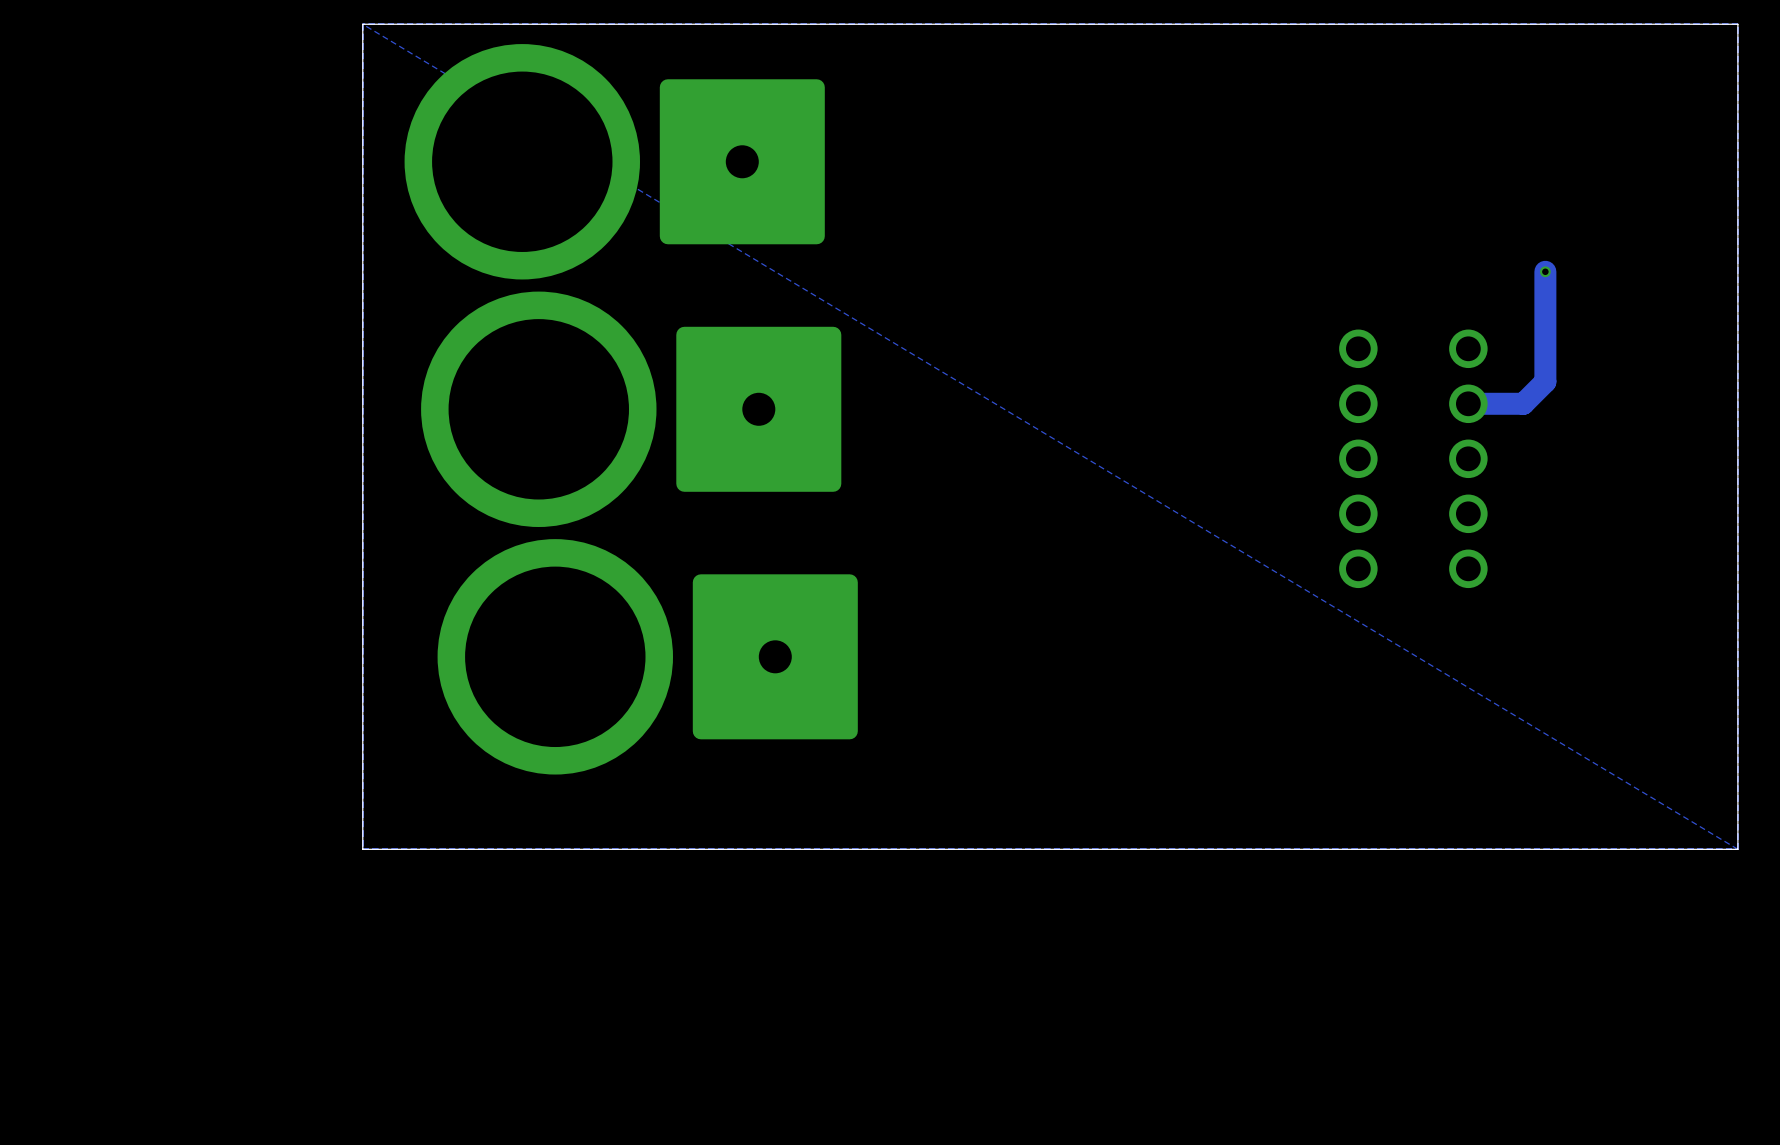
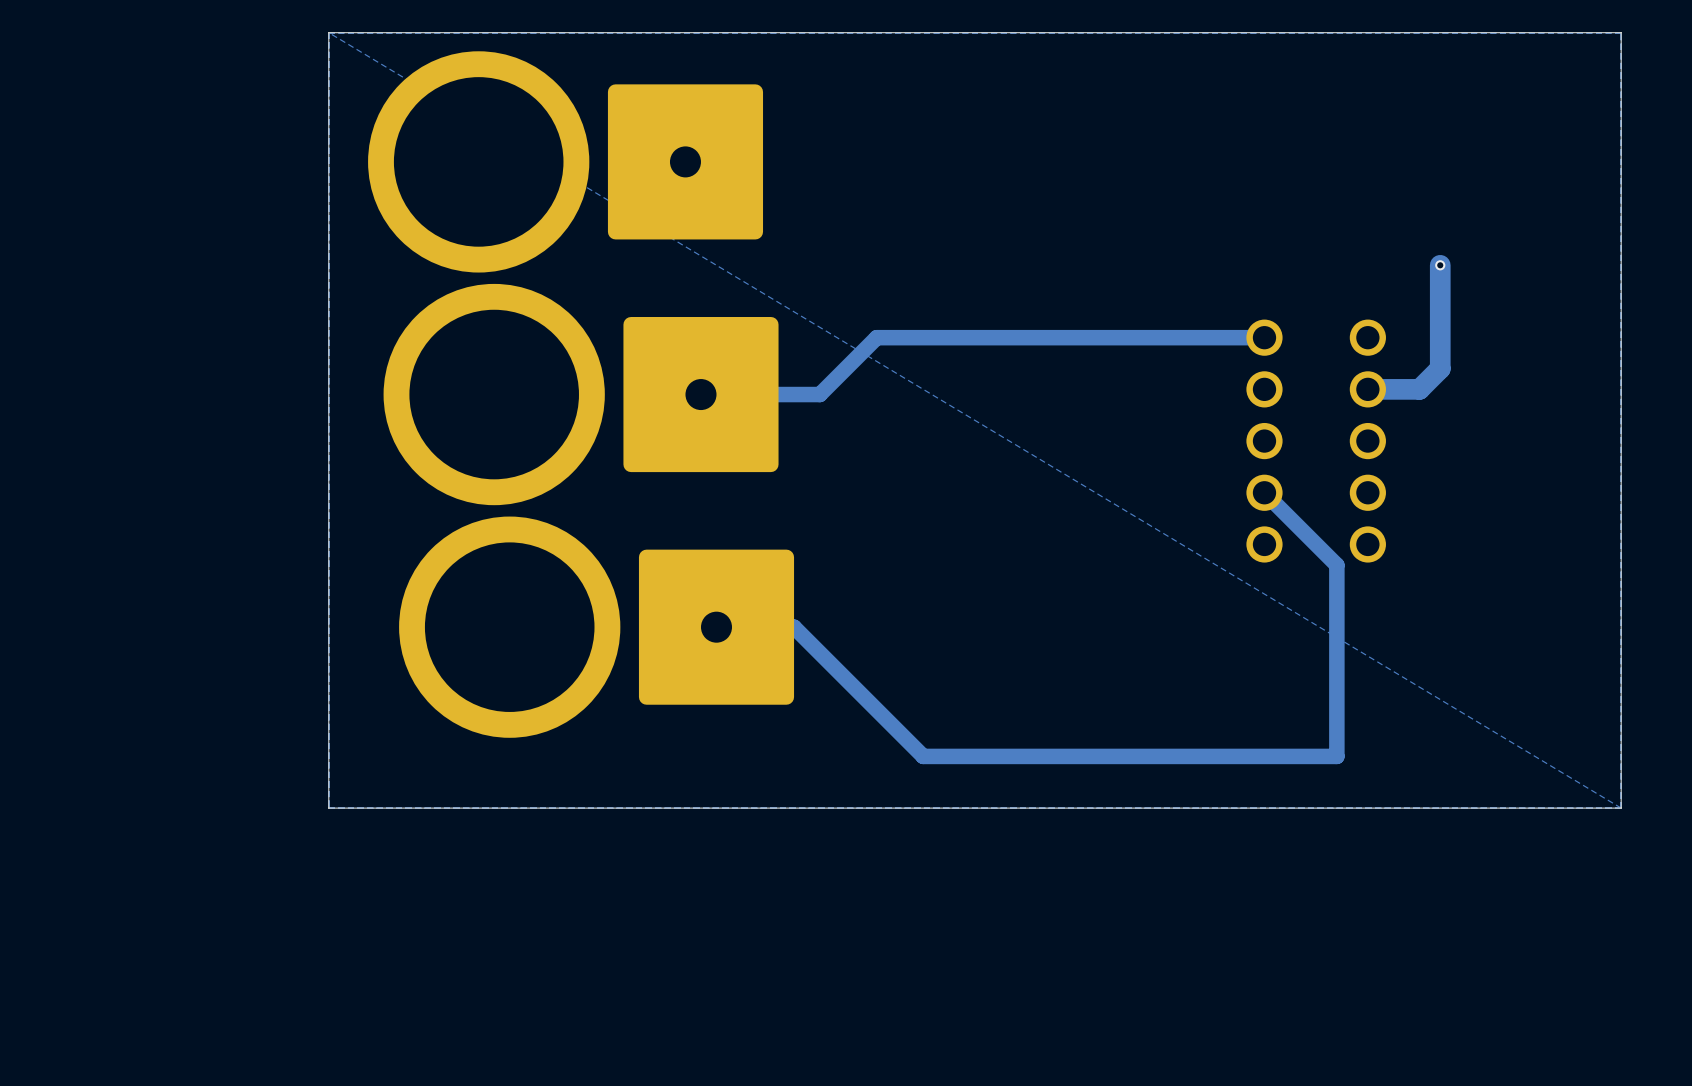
track: none -> (1264, 337) (876, 337) (819, 394) (700, 394)
track: none -> (1264, 492) (1336, 565) (1336, 756) (923, 756) (794, 627) (716, 627)

